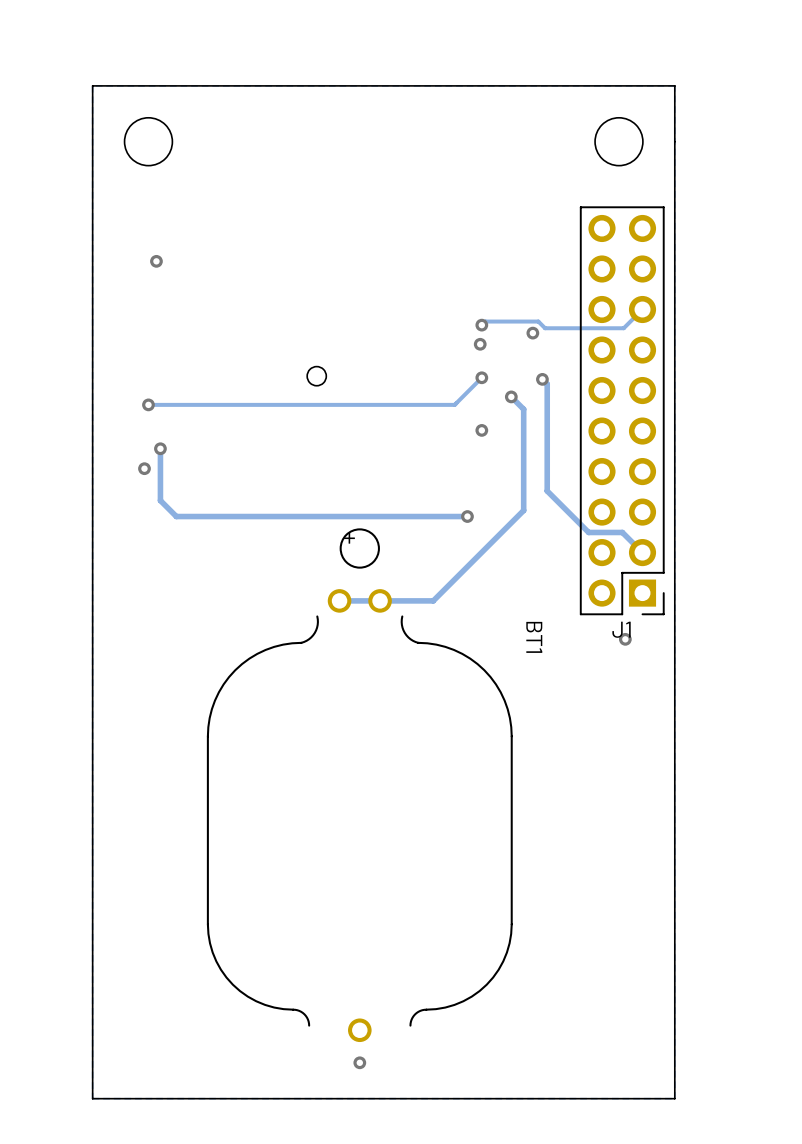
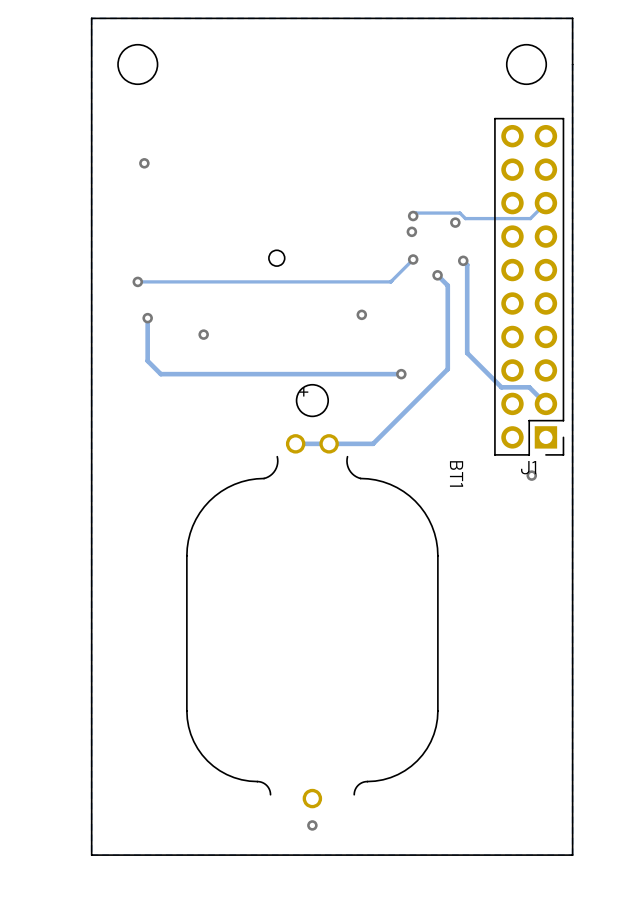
via position: (481, 430) -> (361, 314)
via position: (144, 468) -> (203, 334)

